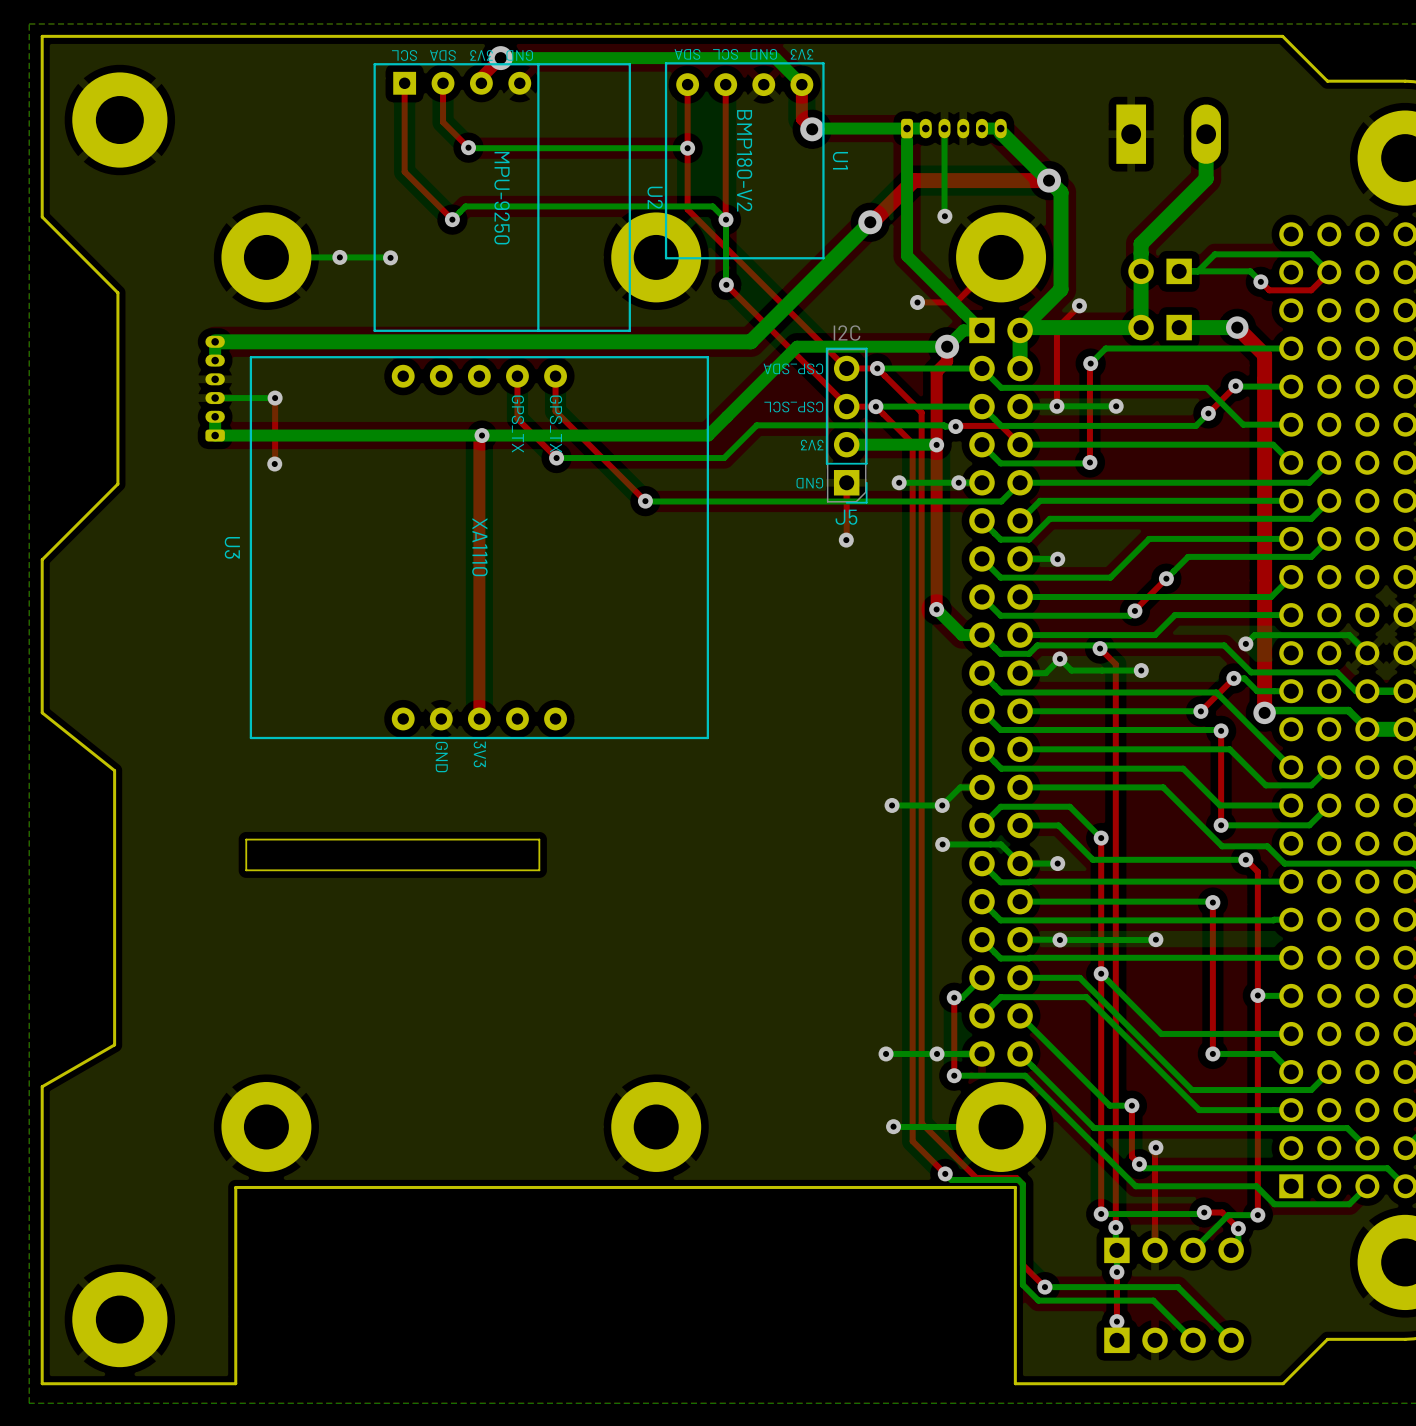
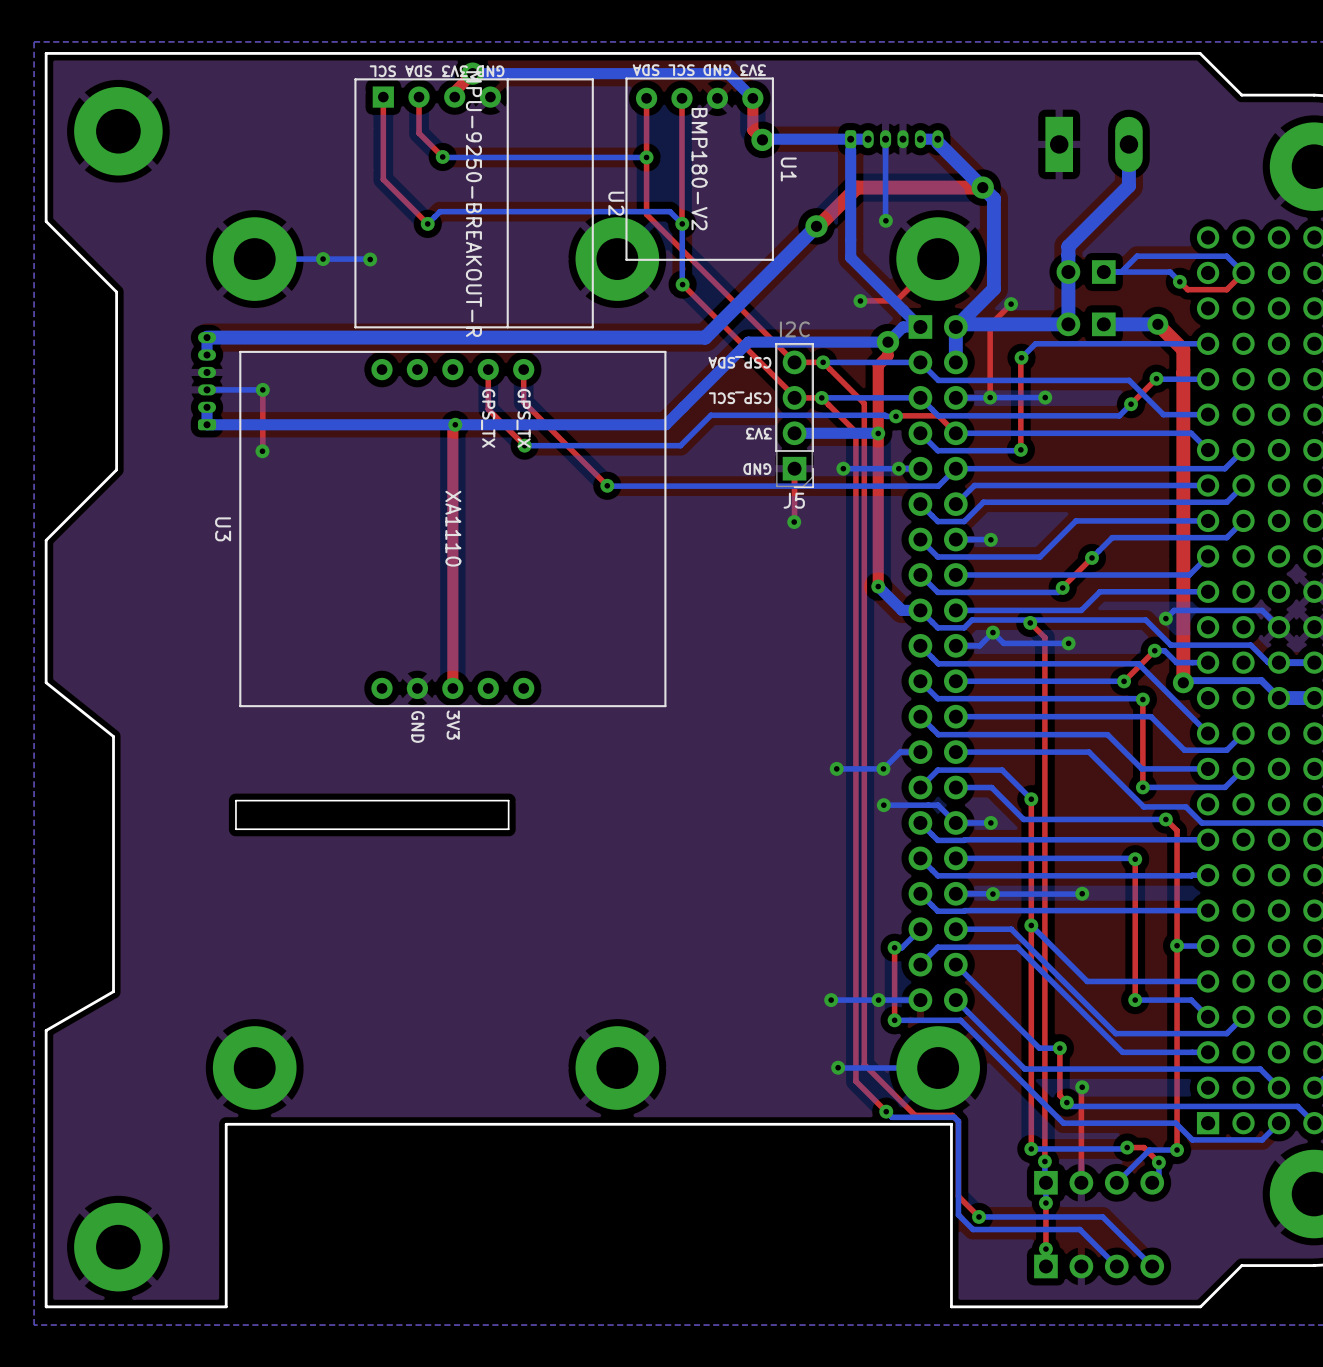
U2 value: MPU-9250 (502, 198) -> MPU-9250-BREAKOUT-R (473, 204)

